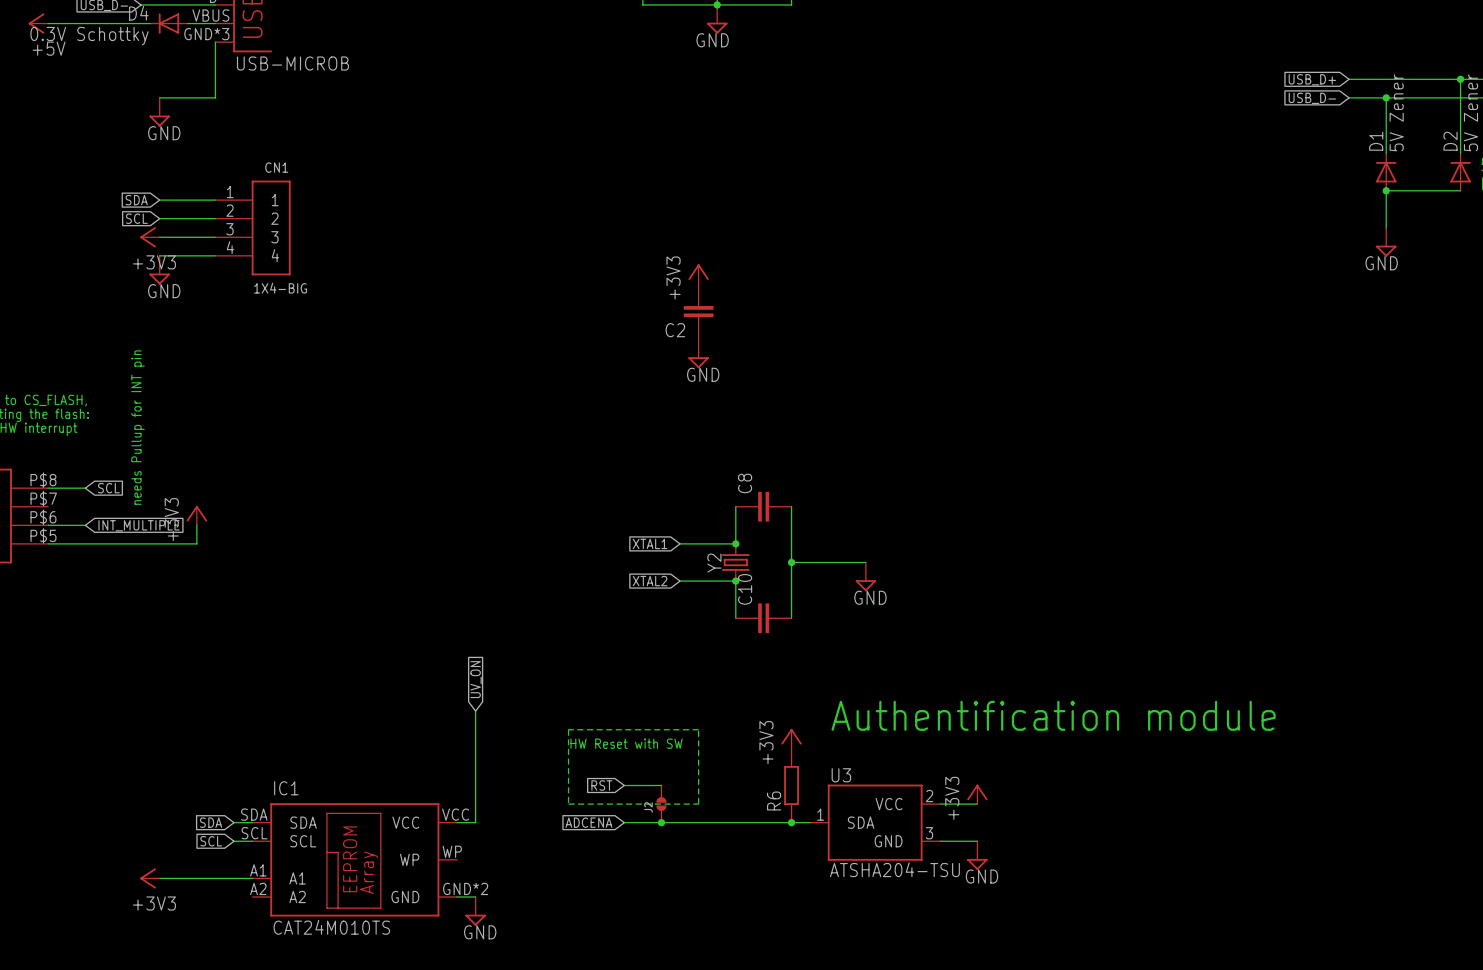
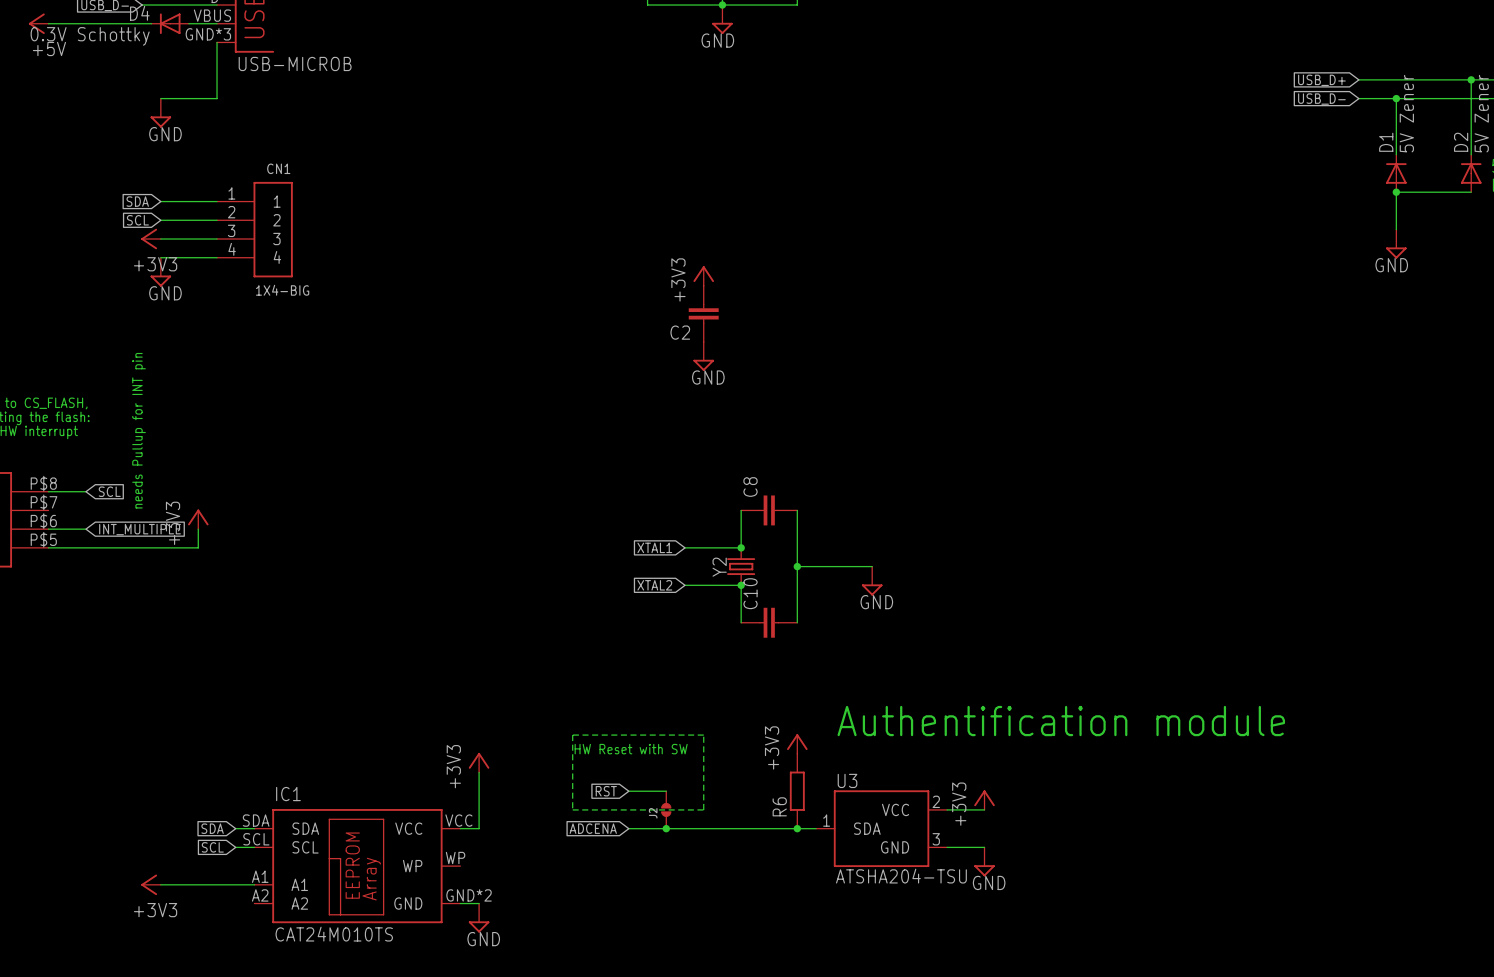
global label: UV_ON (476, 679) -> none
wire: (475, 711) (475, 766) -> none
power symbol: none -> +3V3 (479, 762)

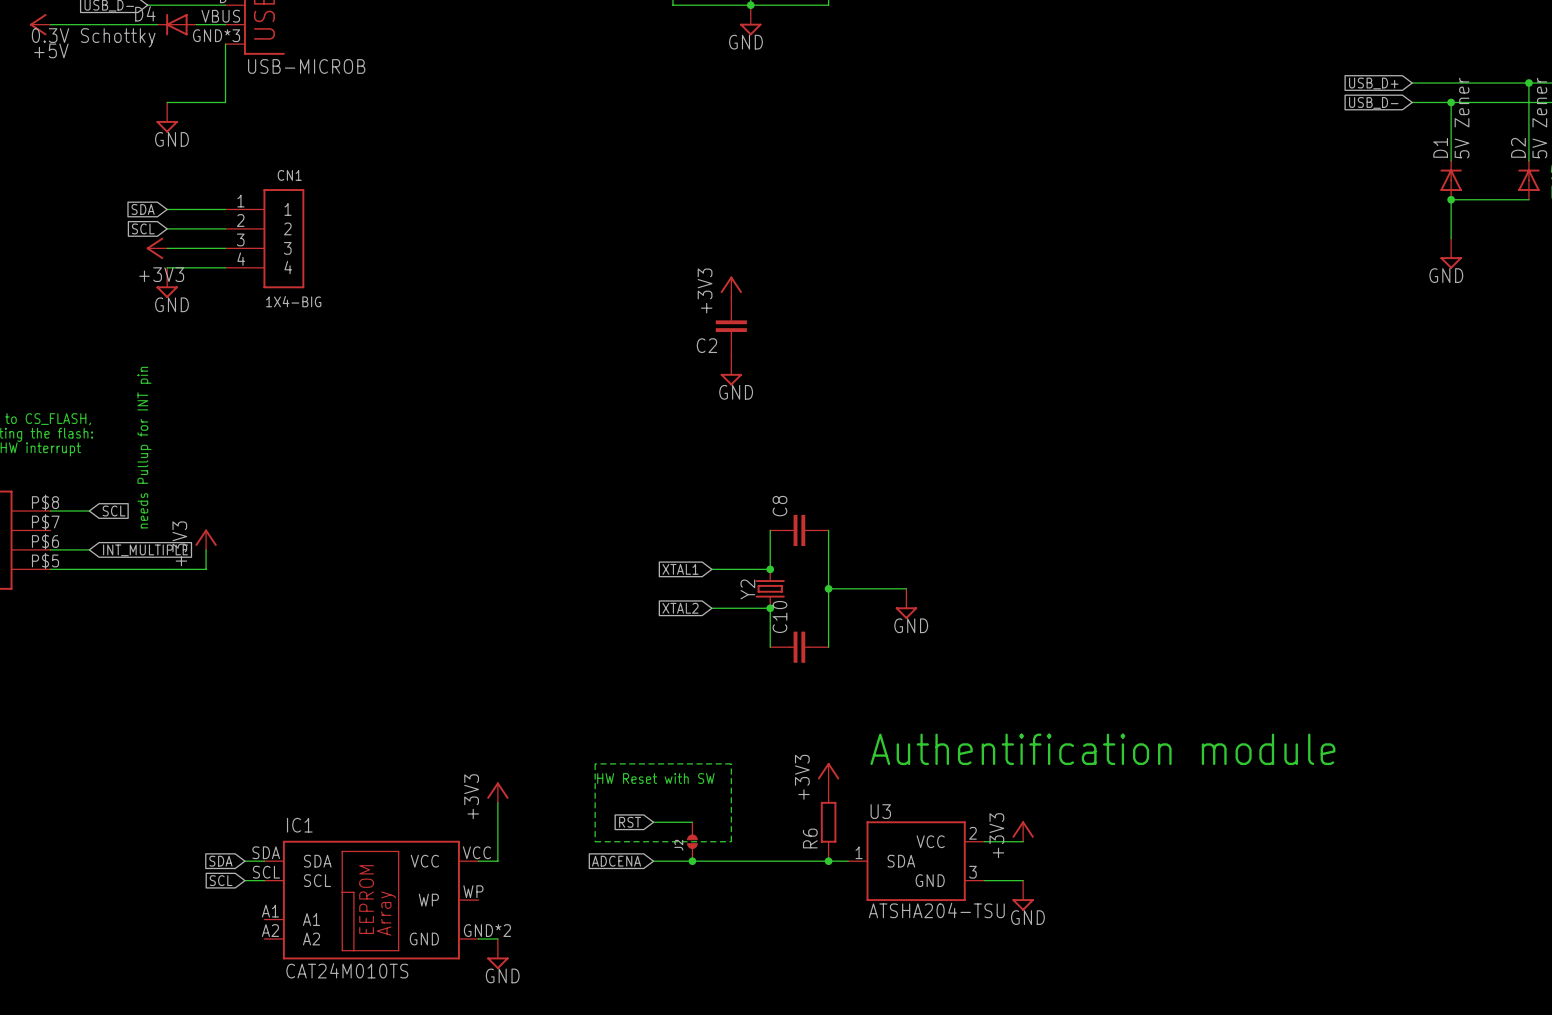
power symbol: +3V3 (151, 884) -> none
wire: (160, 884) (254, 884) -> none

